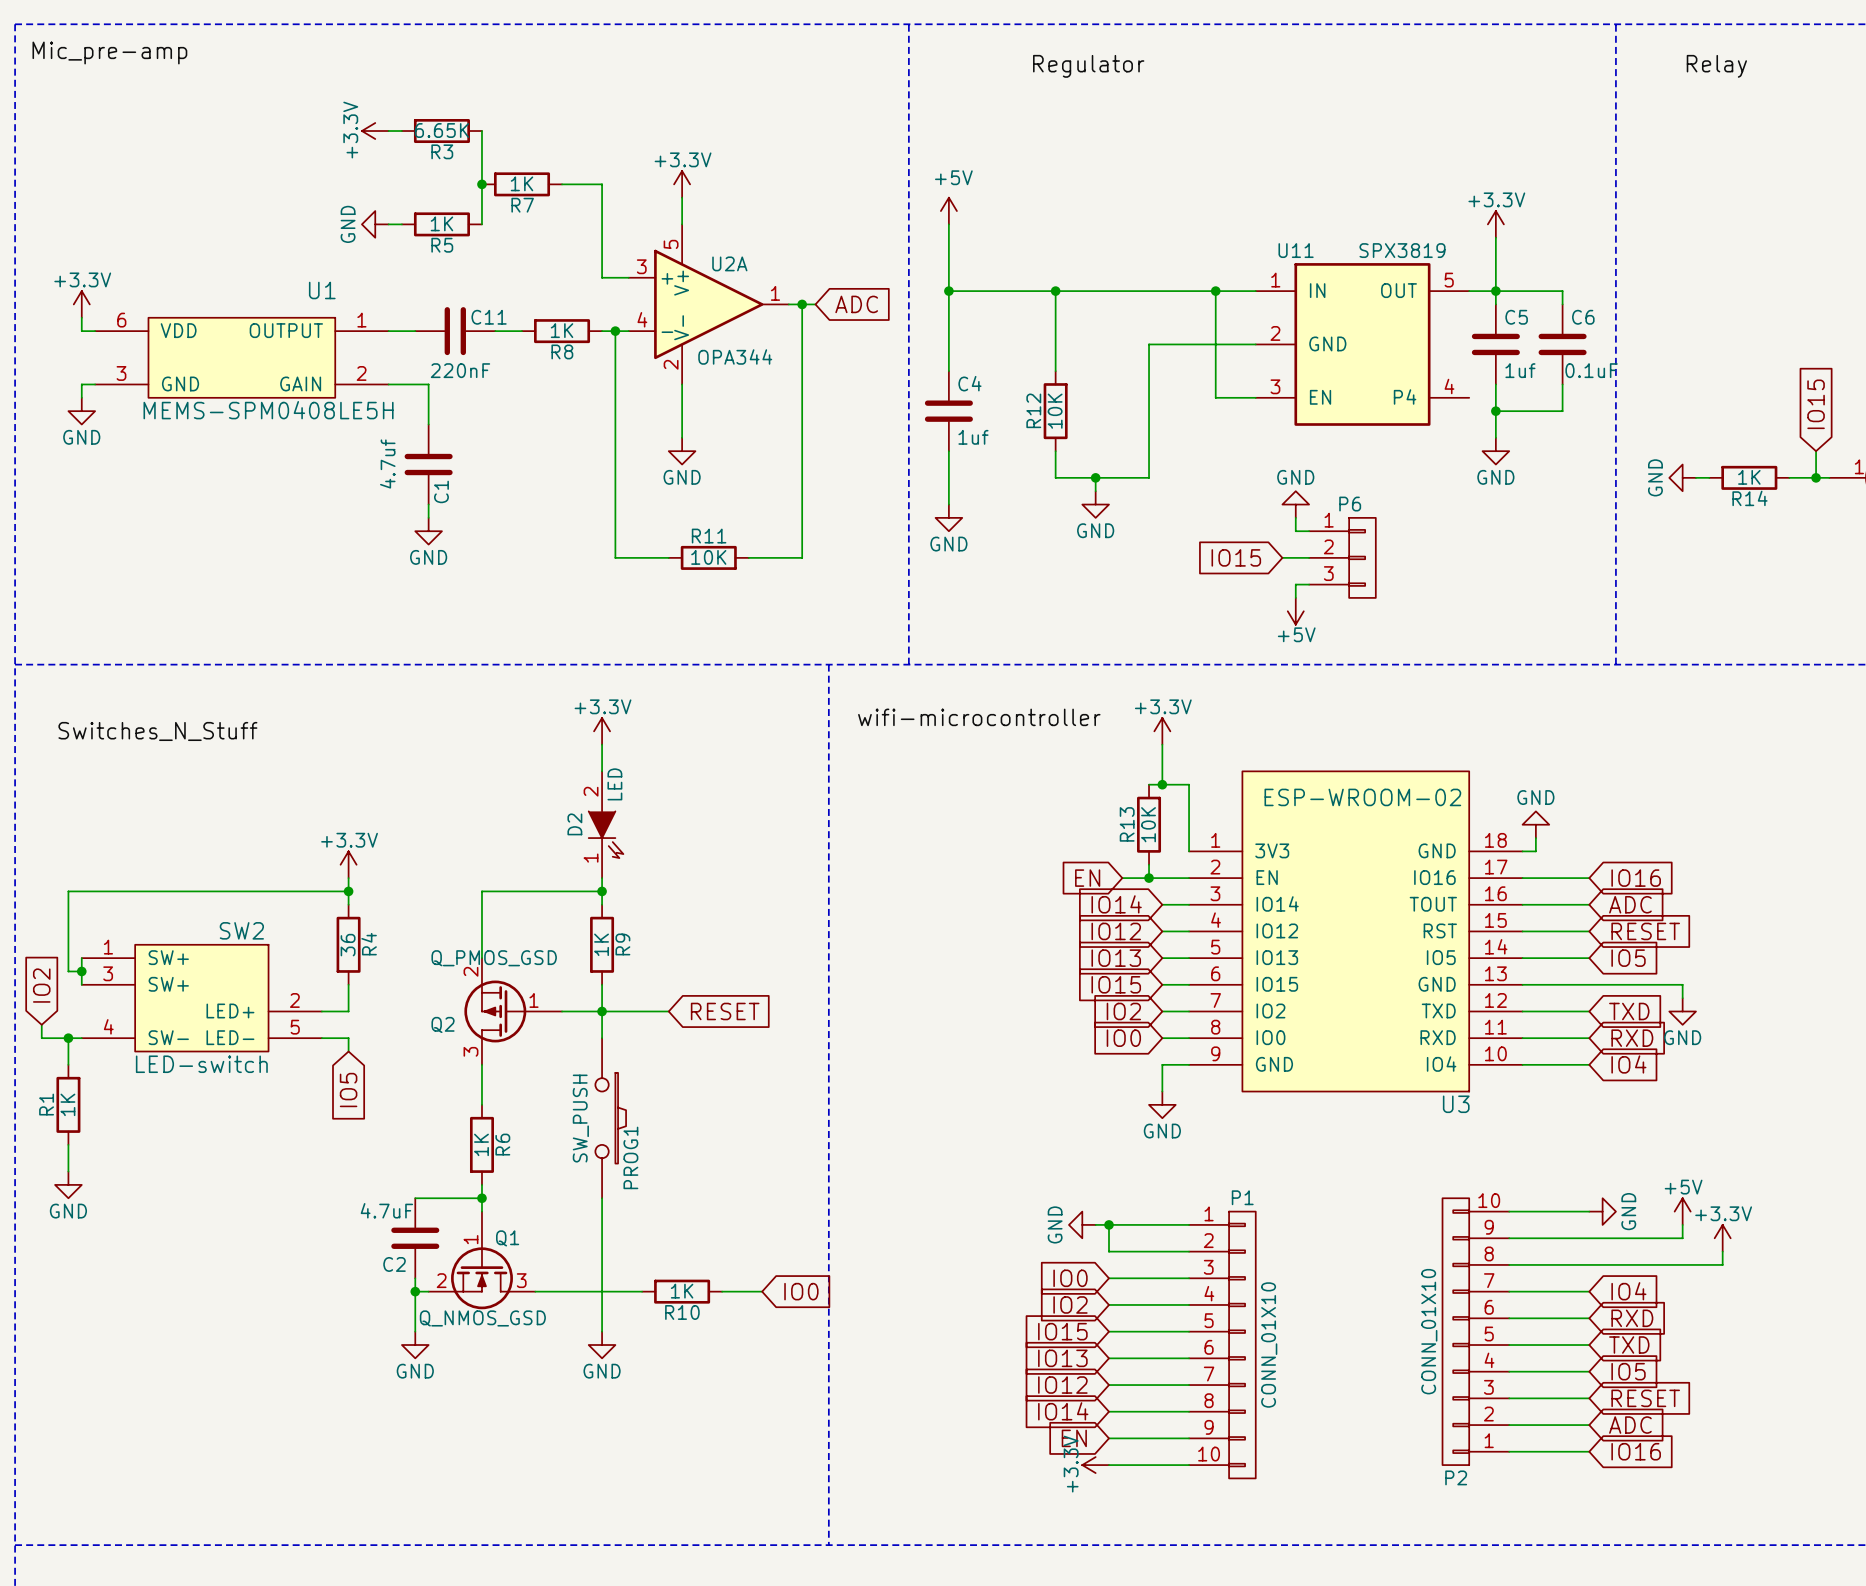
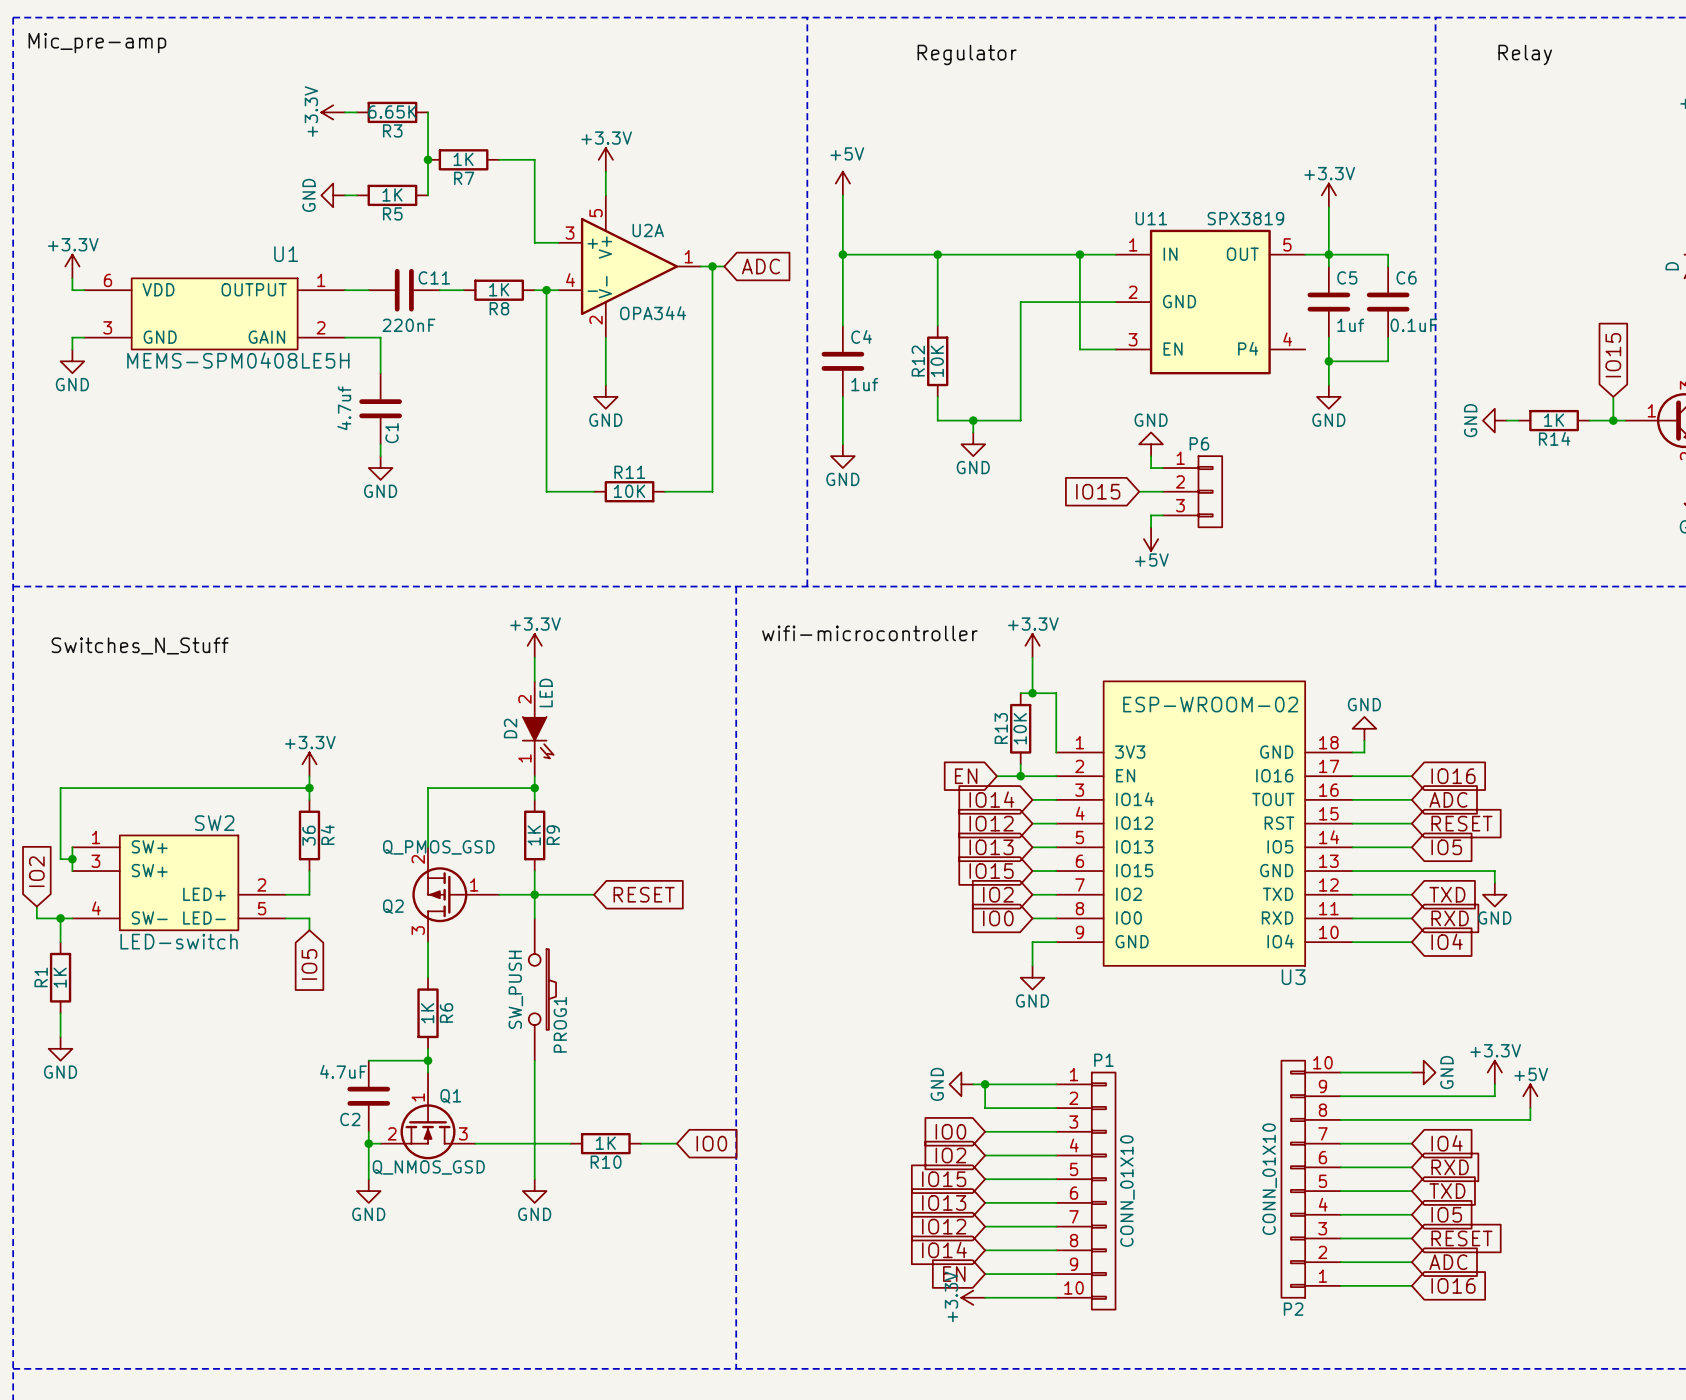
power symbol: +5V (1682, 1211) -> +3.3V (1494, 1072)
power symbol: +3.3V (1722, 1238) -> +5V (1530, 1096)

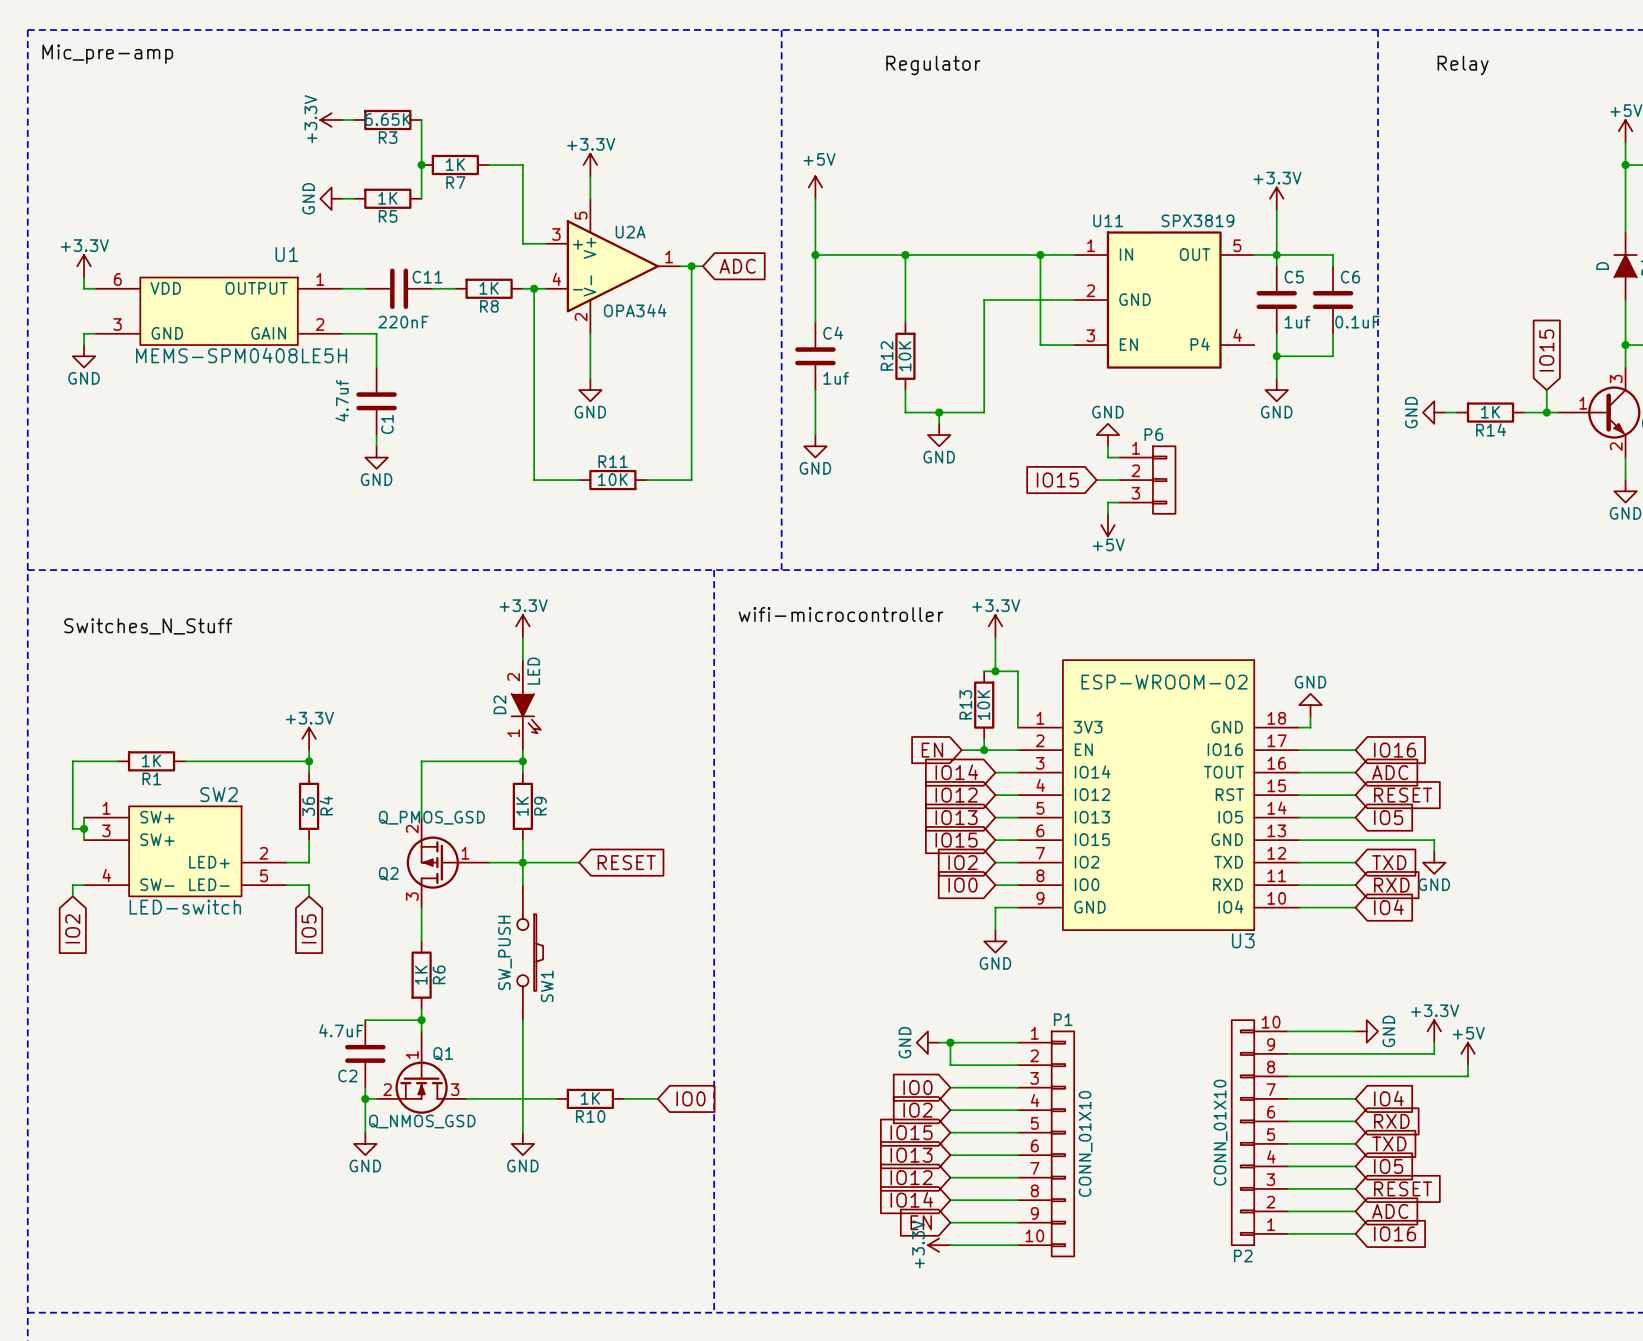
wire: (107, 788) (179, 788) -> none
global label rotation: 0° (36, 871) -> 180° (72, 928)
global label position: IO2 (36, 871) -> IO2 (72, 928)
wire: (36, 906) (36, 918) (60, 918) -> none
junction: (60, 918) -> none
wire: (60, 930) (60, 942) -> none
R1 name position: R1 (41, 977) -> R1 (151, 778)
R1 rotation: 0° (60, 977) -> 90° clockwise (151, 761)
R1 position: (60, 977) -> (151, 761)
wire: (60, 1013) (60, 1036) -> none
PROG1 name: PROG1 (560, 1024) -> SW1 (547, 986)
power symbol: GND (60, 1048) -> none

